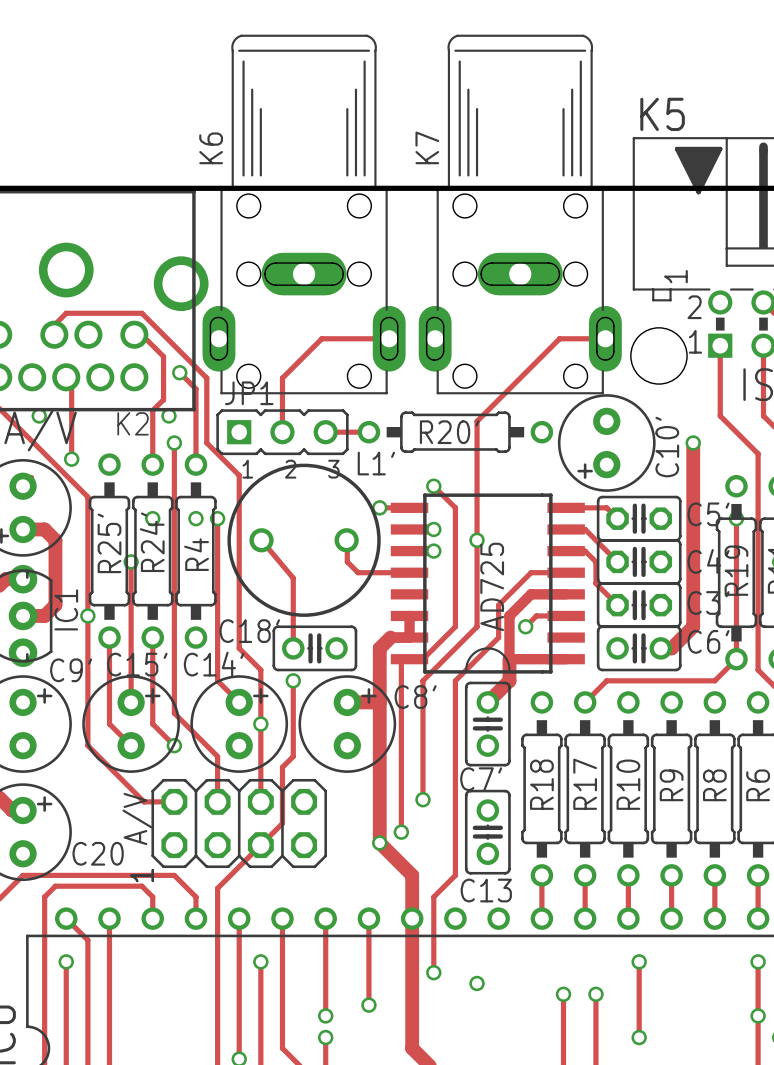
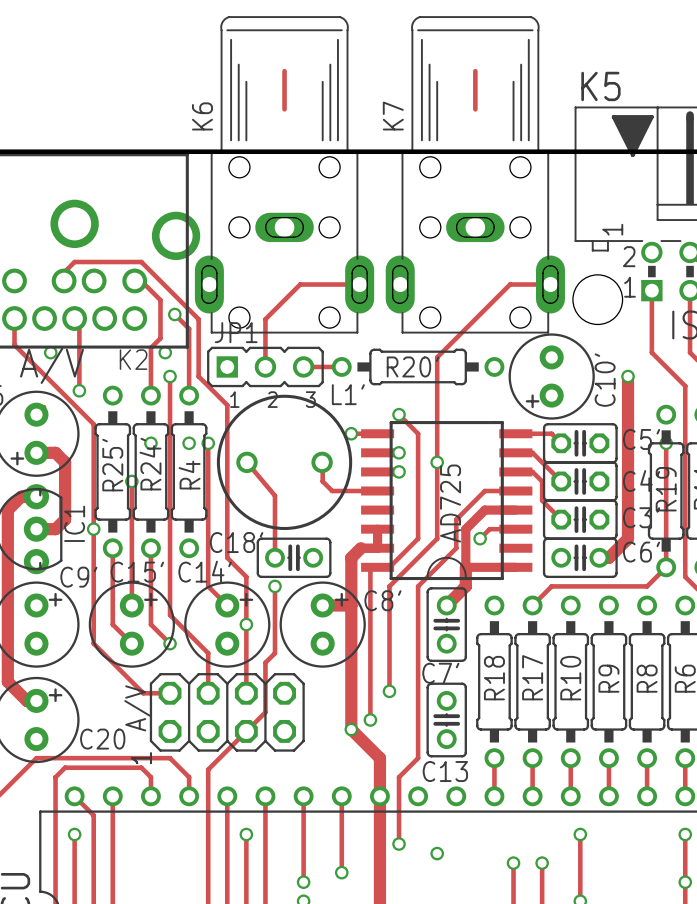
K6 footprint: [202, 34, 406, 395] -> [194, 16, 375, 334]
K7 footprint: [418, 34, 622, 395] -> [385, 16, 565, 334]
track: none -> (284, 71) (284, 109)
track: none -> (475, 71) (475, 109)

